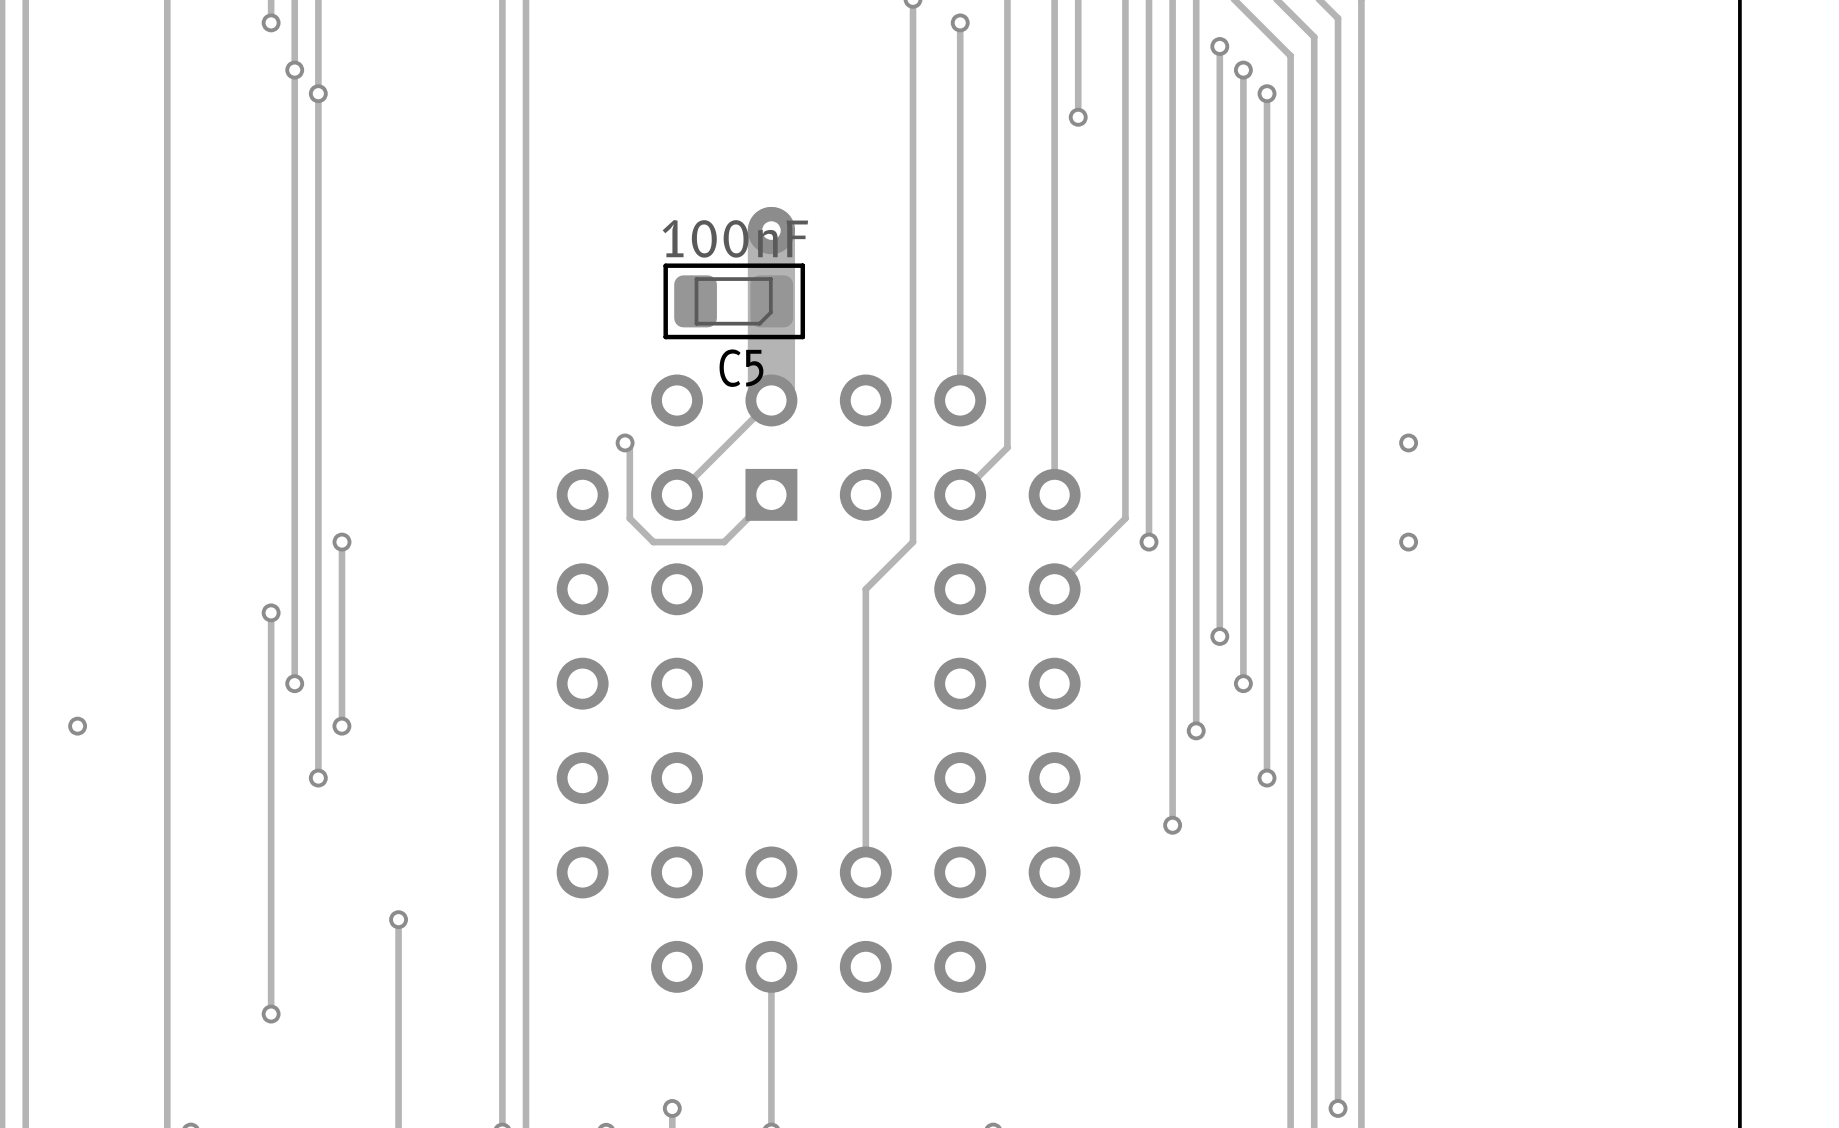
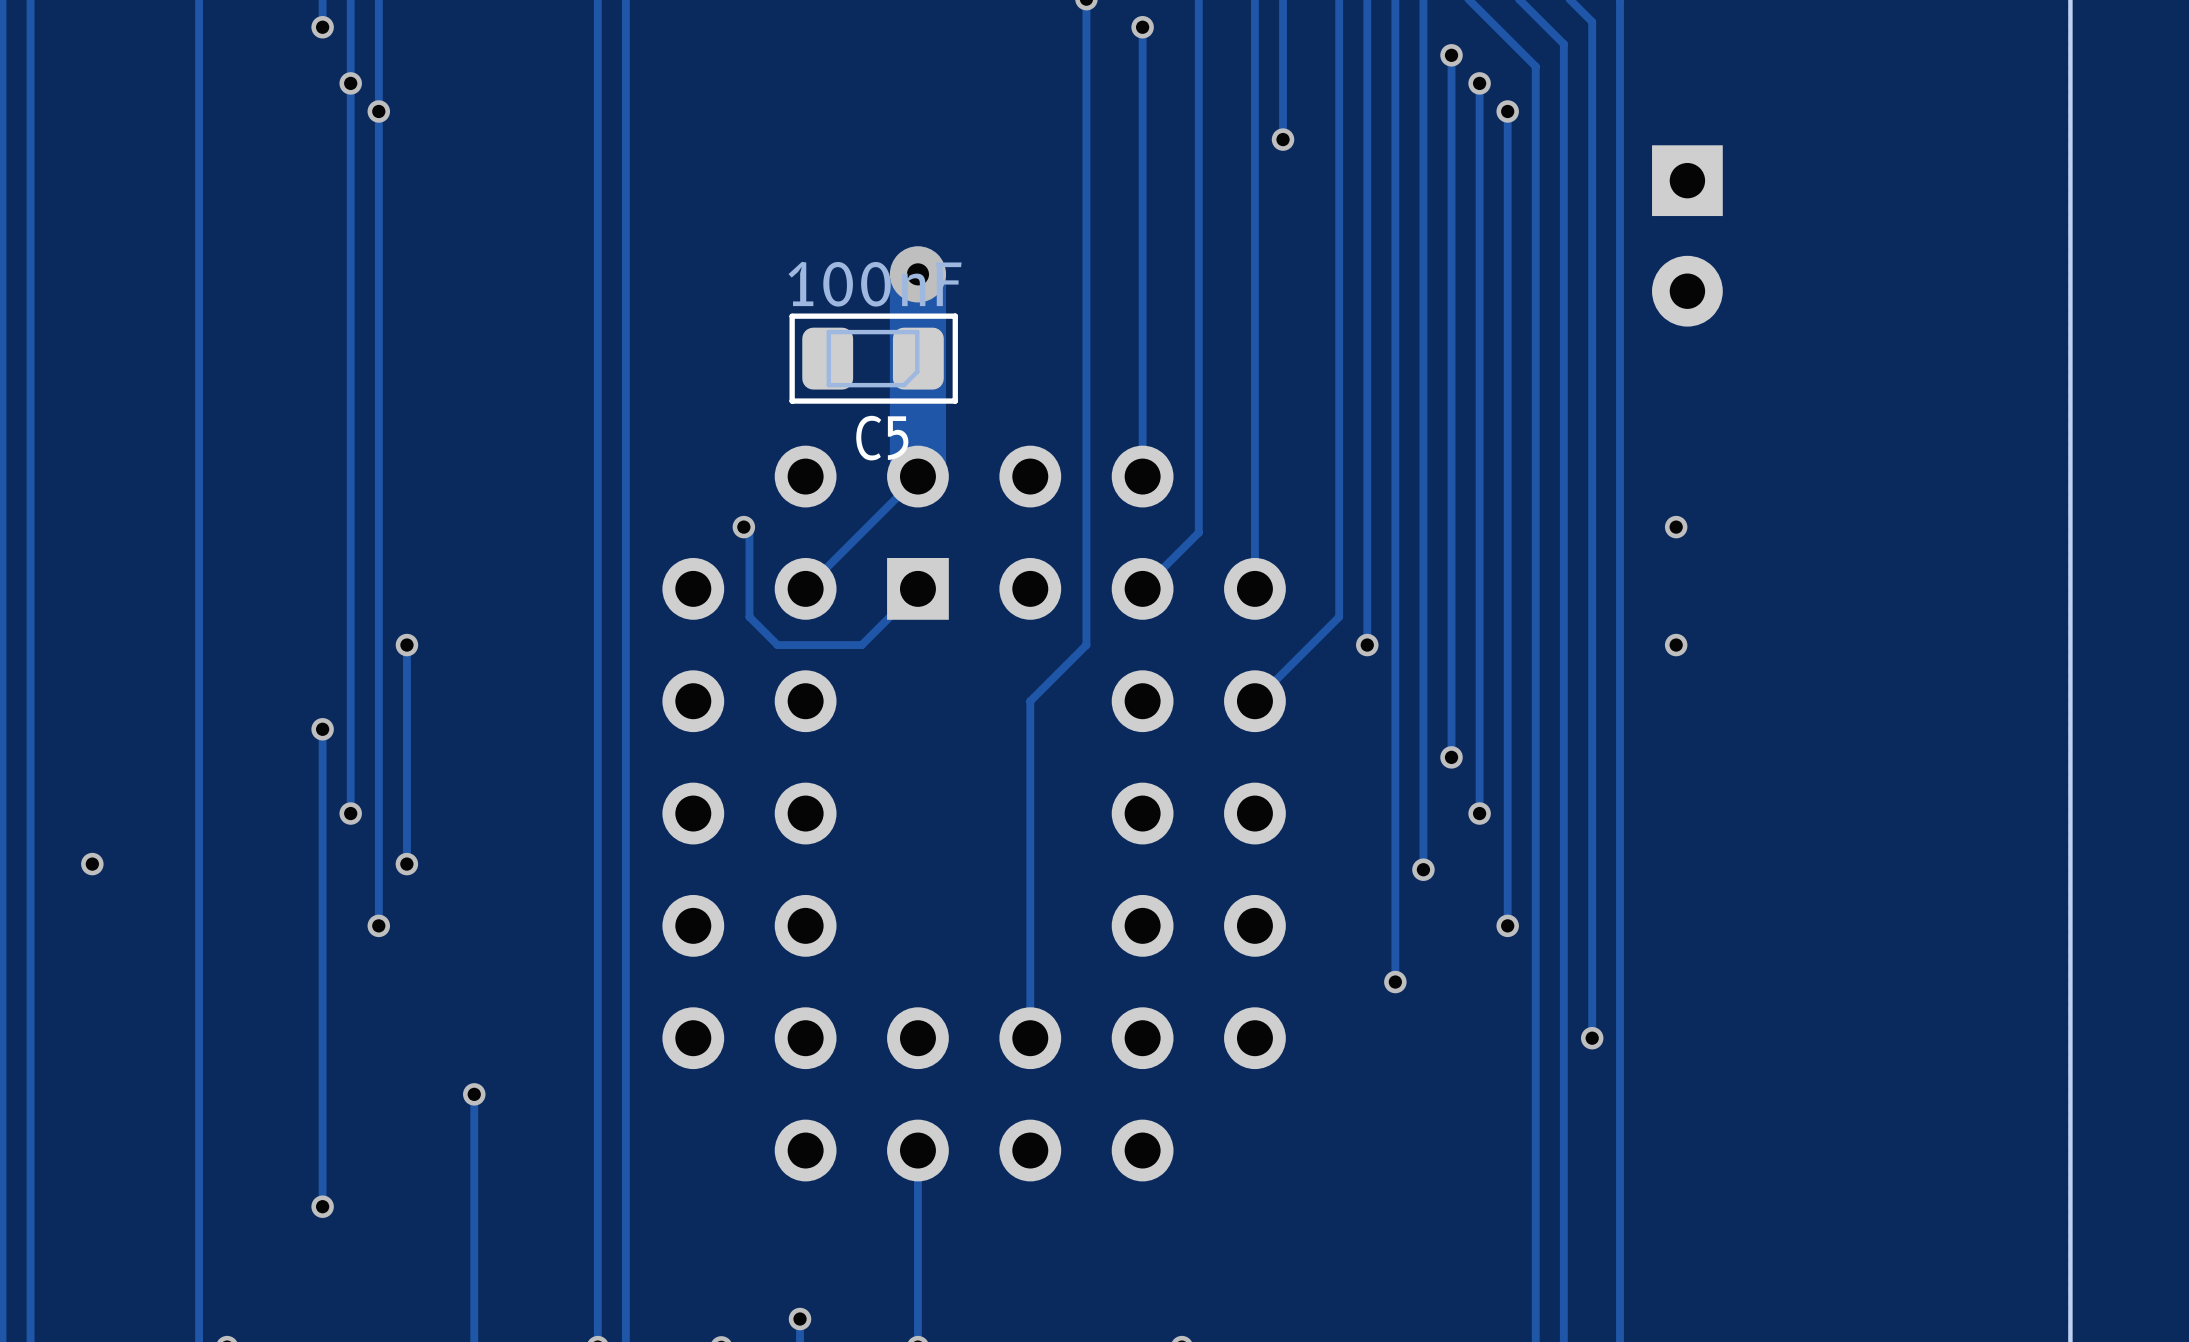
part: none -> (1687, 235)
track: (1338, 872) (1338, 1108) -> none
via: none -> (1592, 1038)
via: (1338, 1108) -> none

